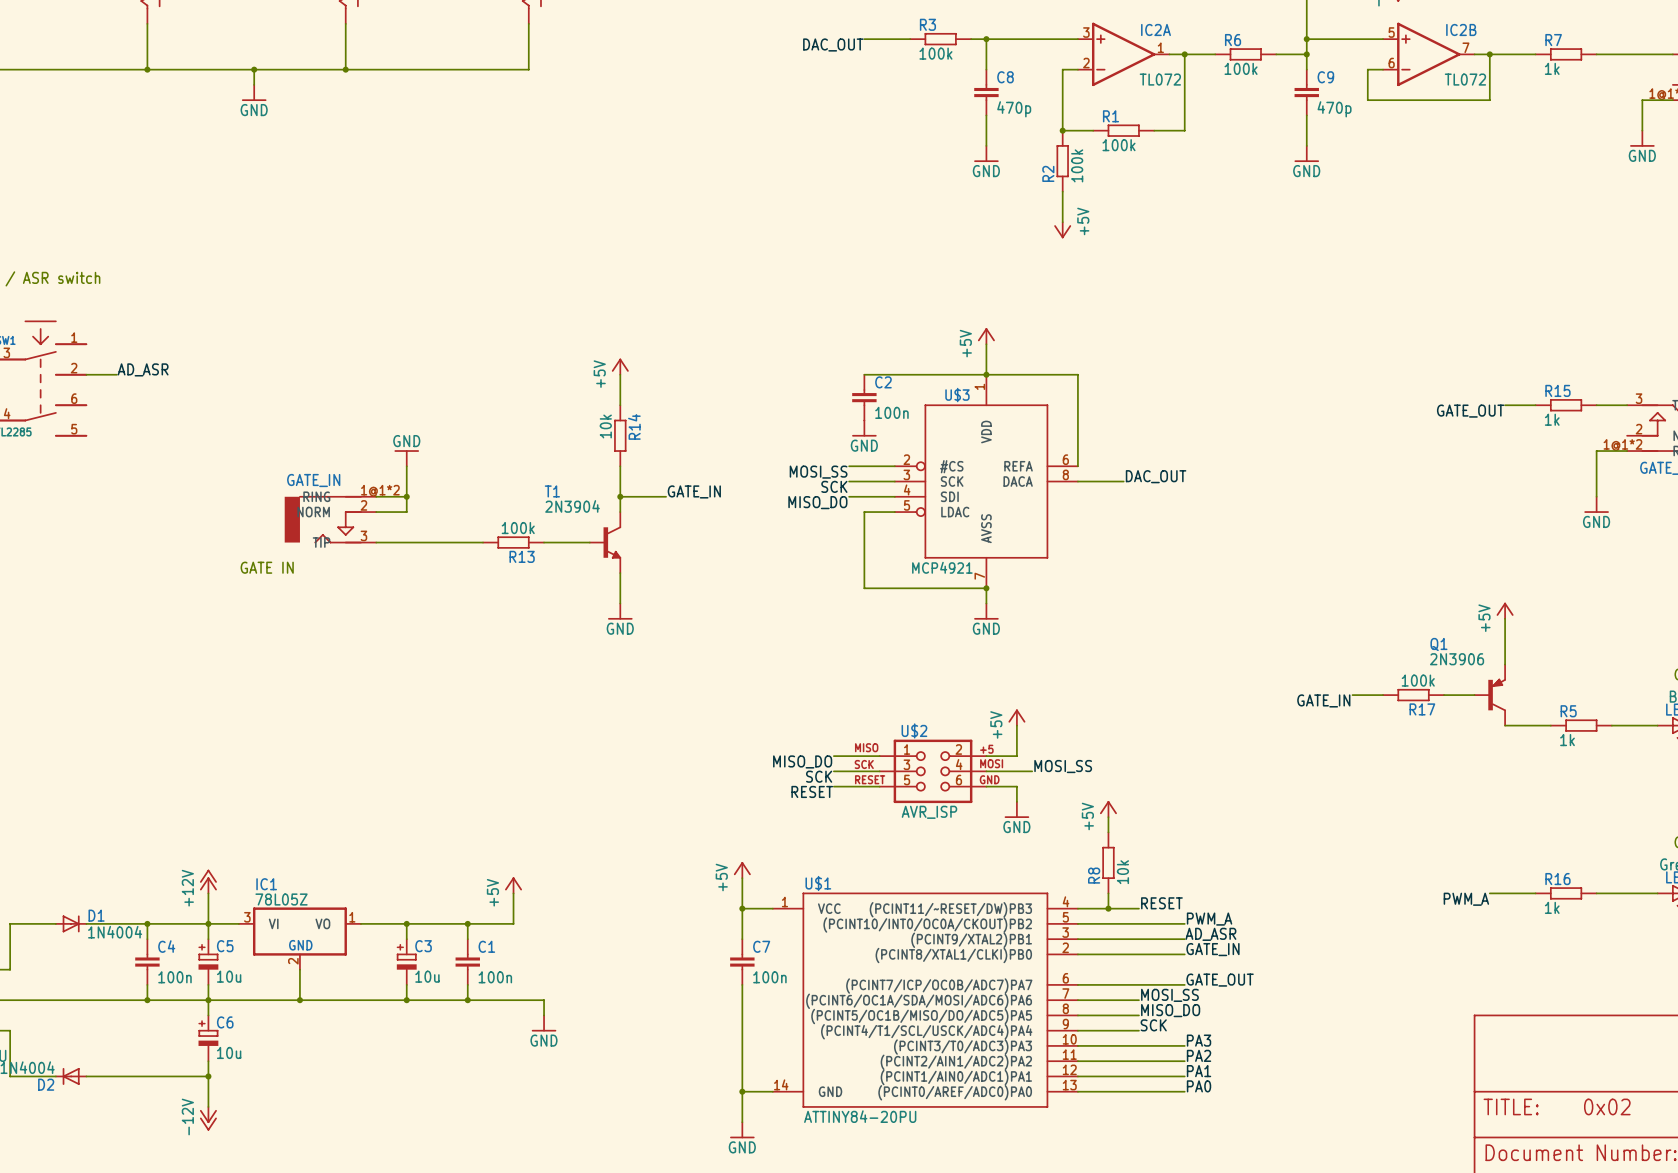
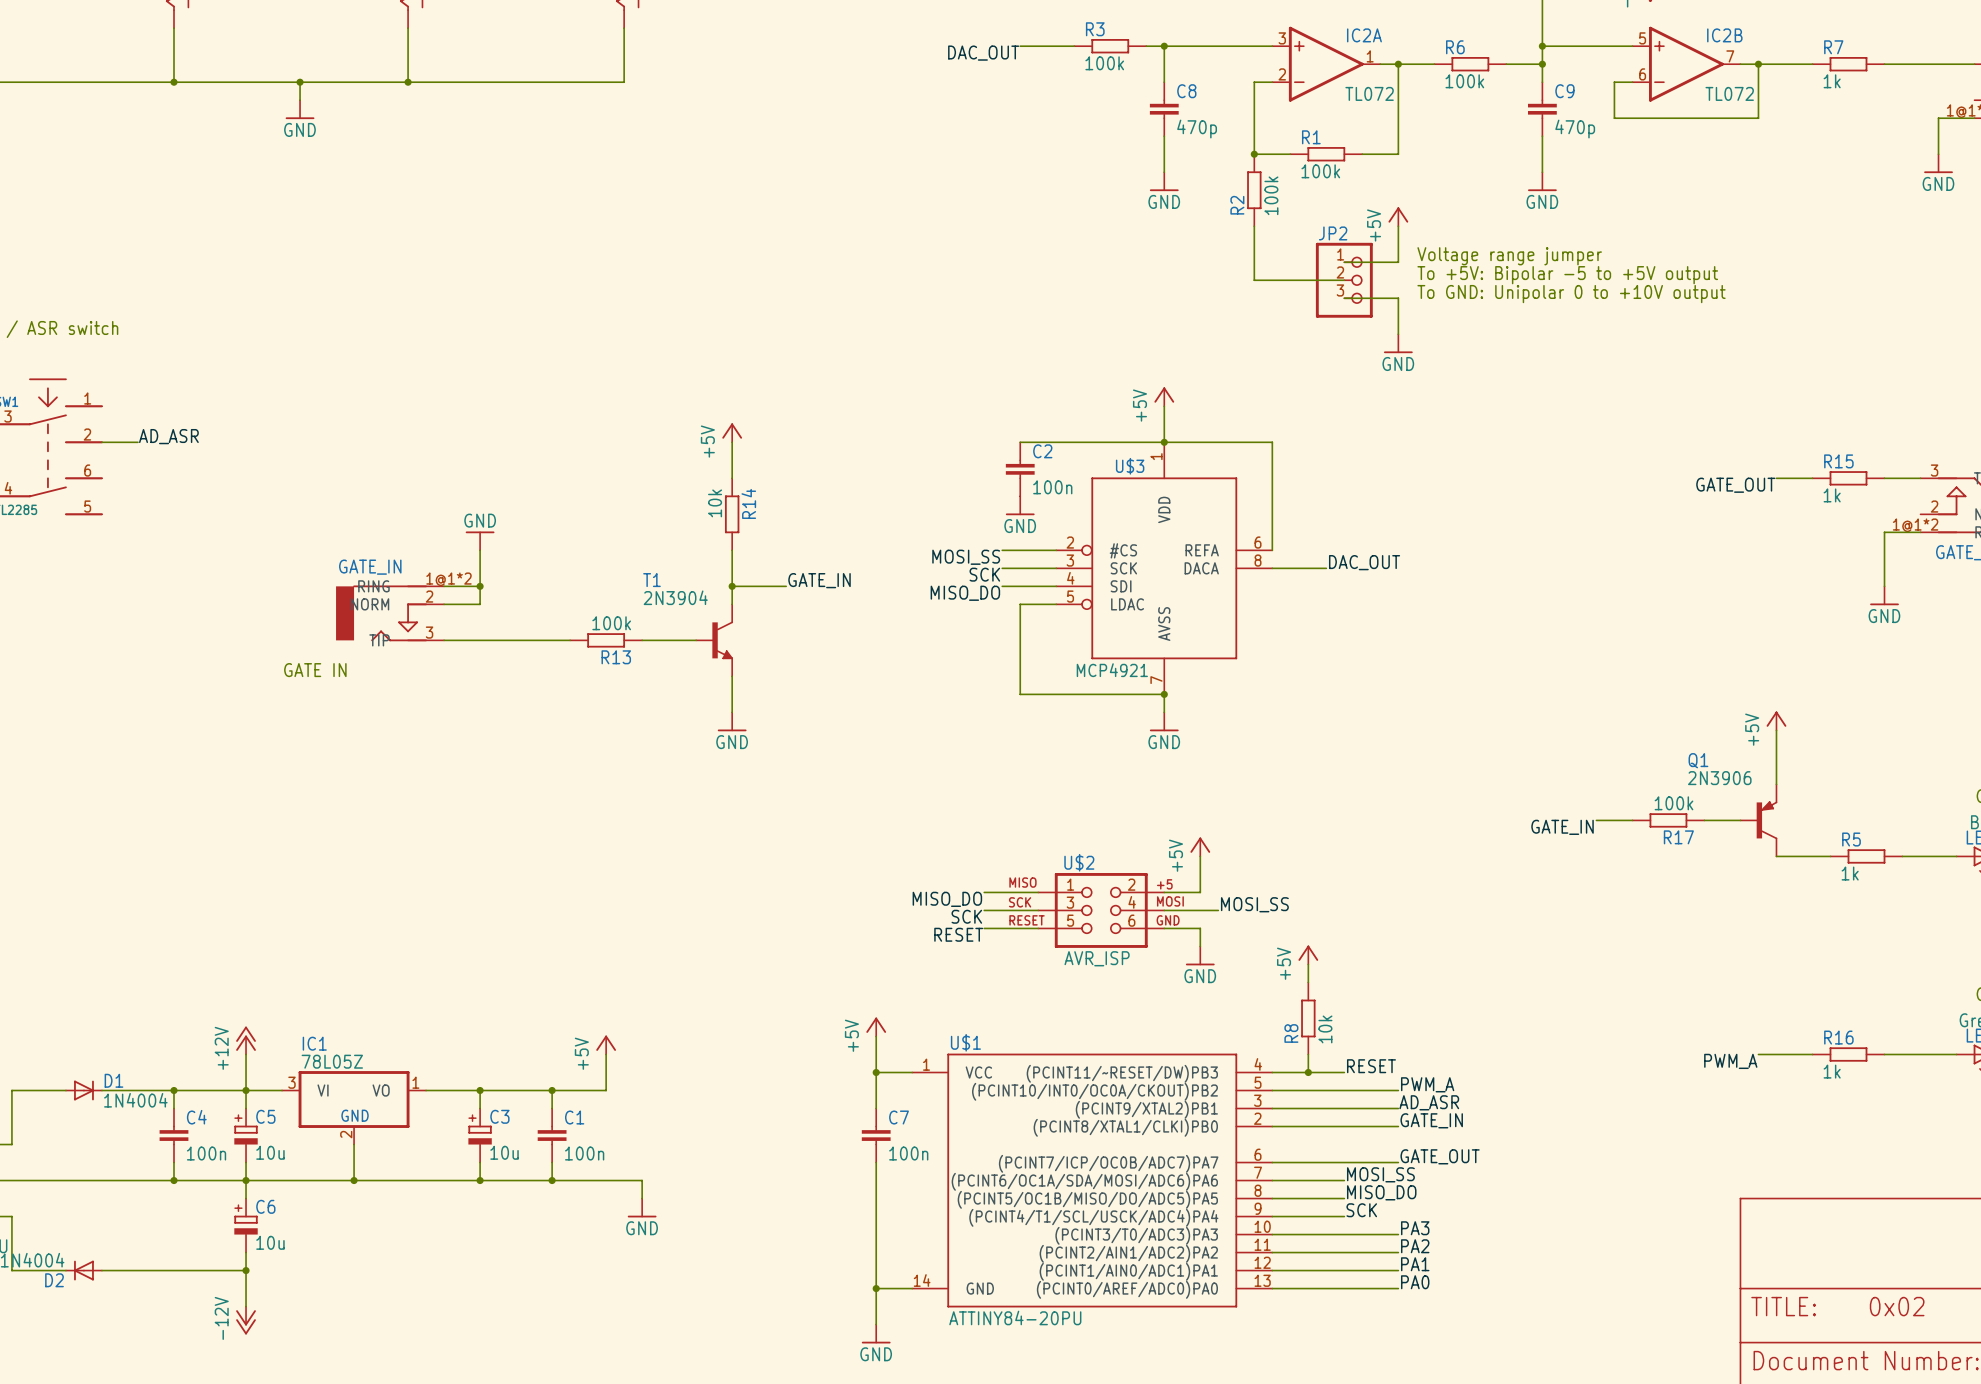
wire: none -> (1398, 226) (1398, 262) (1344, 262)
text: none -> Voltage range jumper (1509, 256)
wire: none -> (1254, 262) (1254, 280) (1344, 280)
power symbol position: +5V (1062, 230) -> +5V (1398, 216)
power symbol rotation: 0° (1062, 231) -> 180° (1398, 215)
text: none -> To +5V: Bipolar -5 to +5V output (1567, 275)
JP2: none -> (1344, 280)
text: none -> To GND: Unipolar 0 to +10V output (1571, 294)
wire: none -> (1344, 298) (1398, 298) (1398, 334)
power symbol: none -> GND (1398, 343)

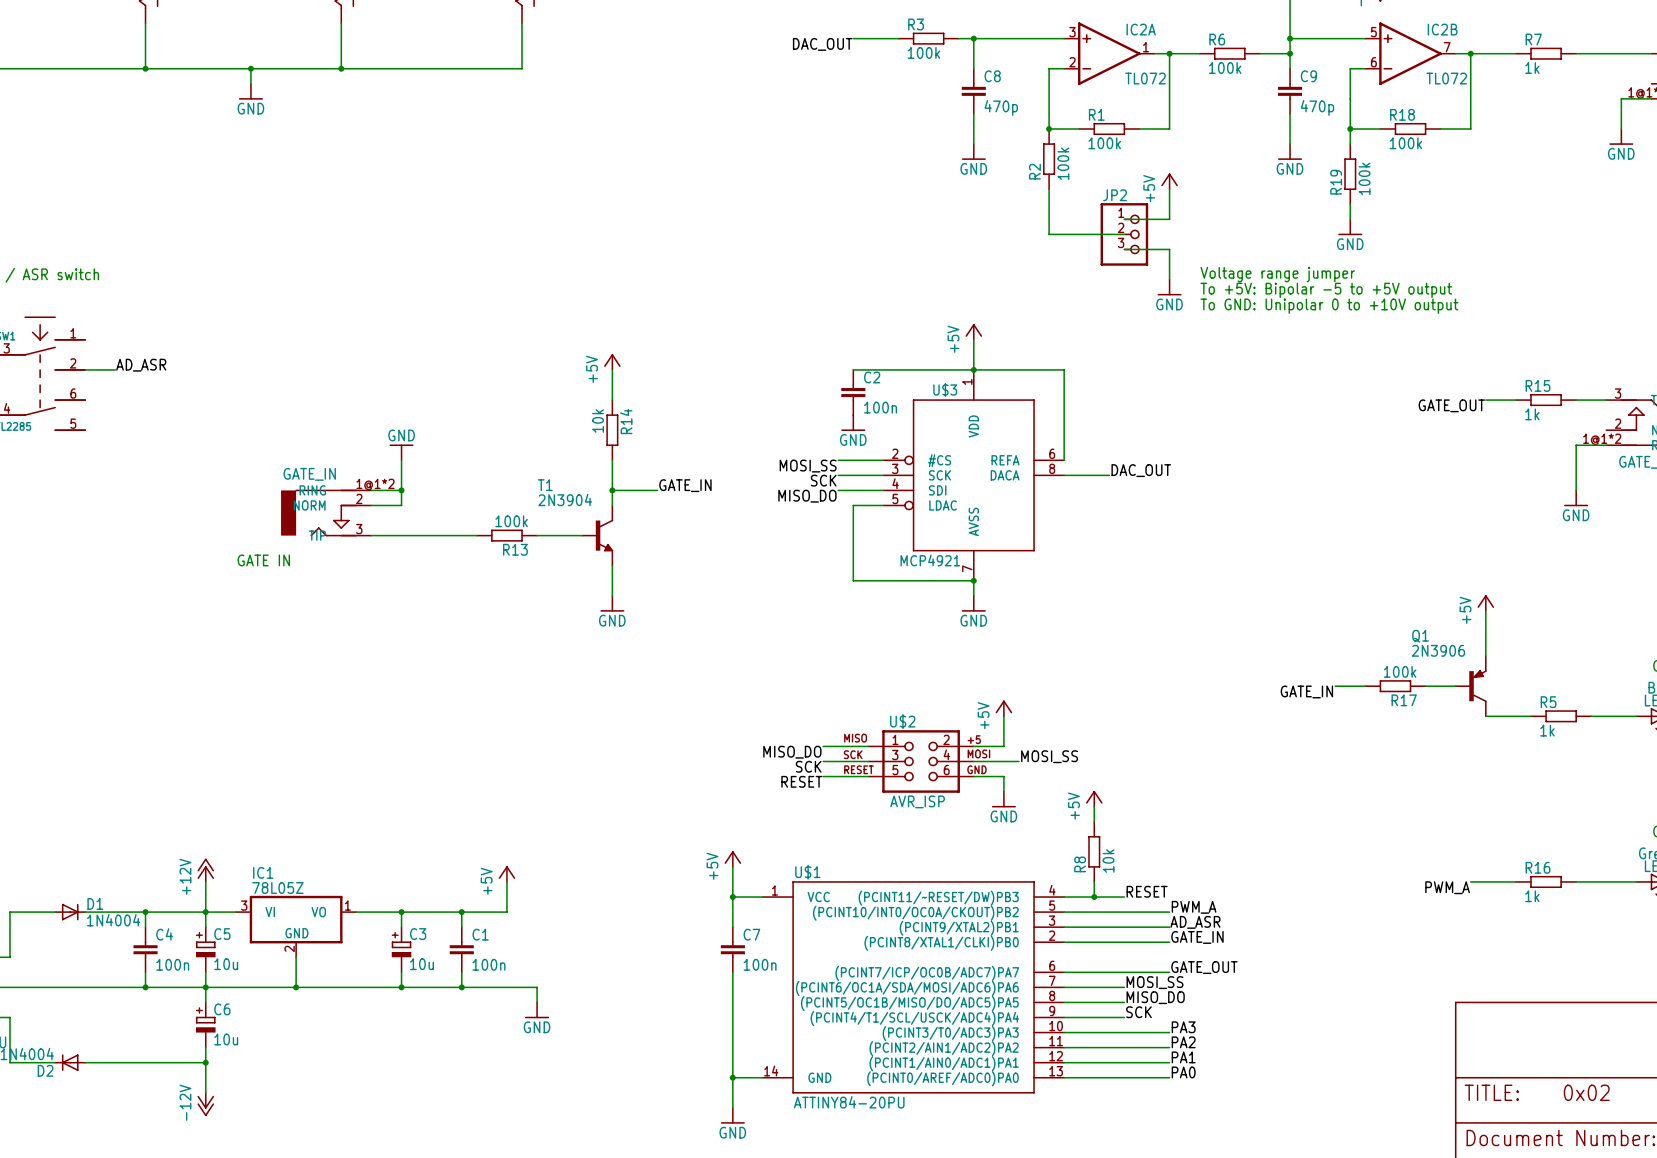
wire: (1614, 118) (1758, 118) -> (1440, 128) (1470, 128) (1470, 98)
wire: none -> (1350, 98) (1350, 144)
wire: none -> (1350, 128) (1380, 128)
junction: none -> (1350, 128)
R18: none -> 100k (1410, 128)
R19: none -> 100k (1350, 174)
wire: none -> (1350, 204) (1350, 219)
text position: Voltage range jumper (1509, 256) -> Voltage range jumper (1277, 274)
power symbol: none -> GND (1350, 227)
text position: To +5V: Bipolar -5 to +5V output (1567, 275) -> To +5V: Bipolar -5 to +5V output (1326, 290)
text position: To GND: Unipolar 0 to +10V output (1571, 294) -> To GND: Unipolar 0 to +10V output (1329, 306)

